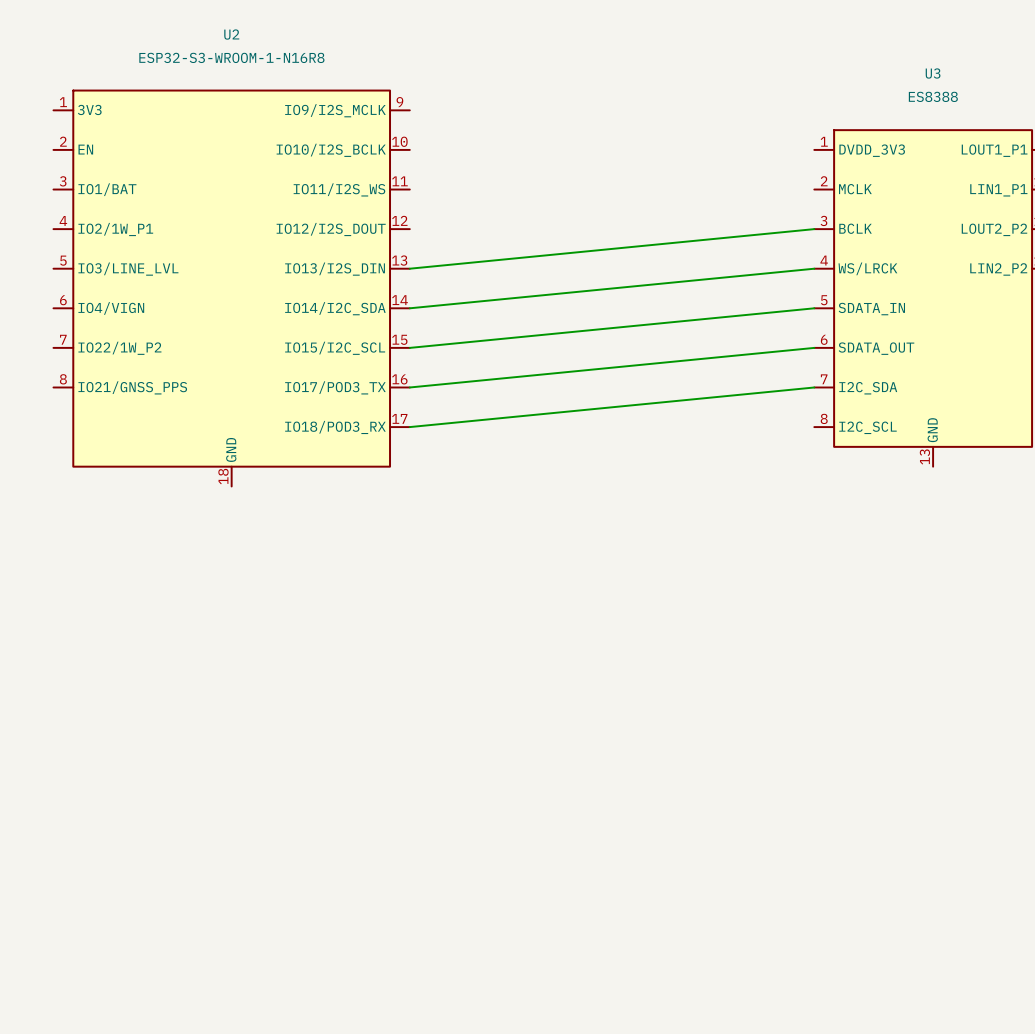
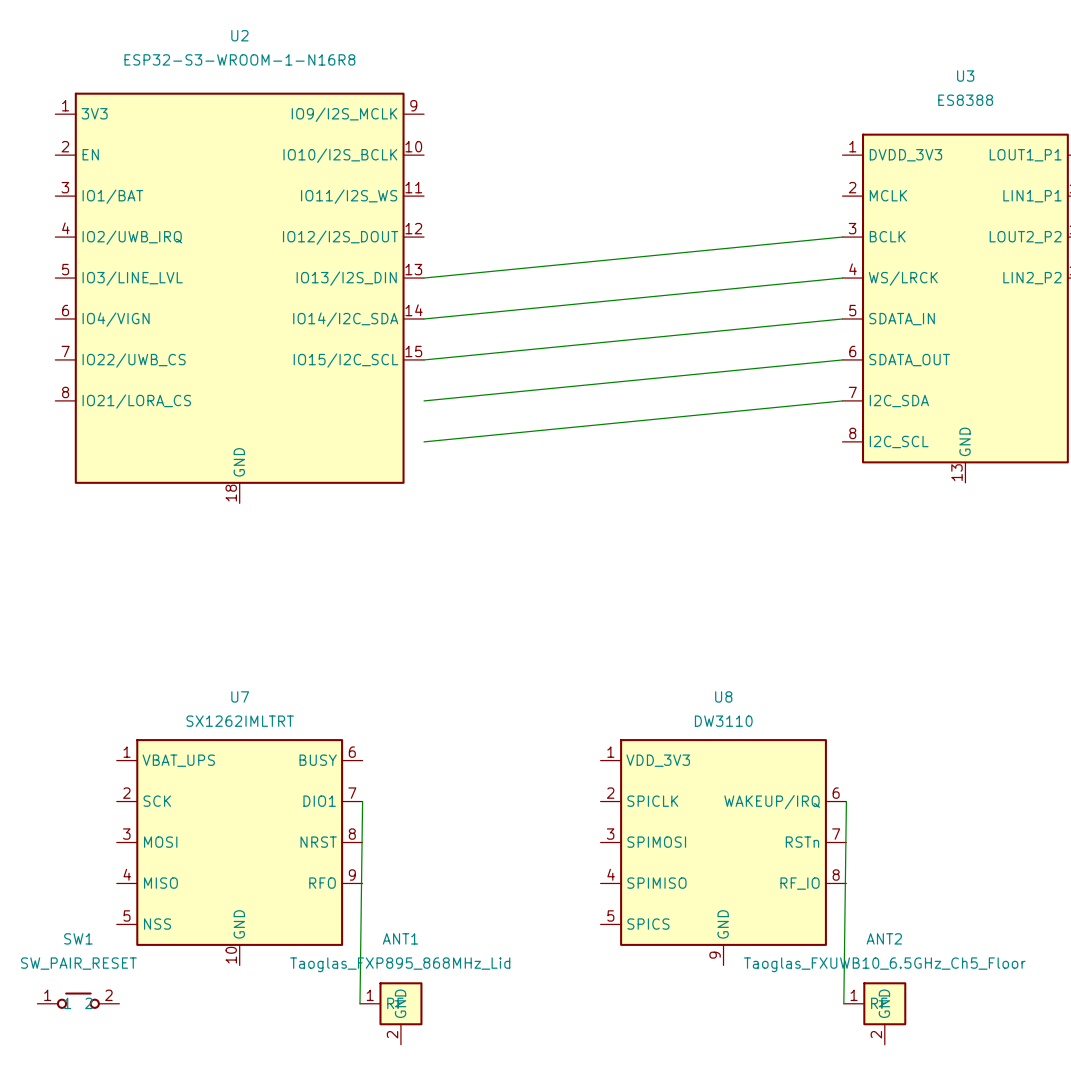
U2 symbol: [53, 89, 410, 487] -> [55, 92, 425, 504]
wire: none -> (362, 801) (359, 1003)
wire: none -> (846, 801) (843, 1003)
U7: none -> SX1262IMLTRT (239, 852)
U8: none -> DW3110 (723, 852)
SW1: none -> SW_PAIR_RESET (78, 1000)
ANT1: none -> Taoglas_FXP895_868MHz_Lid (391, 1013)
ANT2: none -> Taoglas_FXUWB10_6.5GHz_Ch5_Floor (875, 1013)

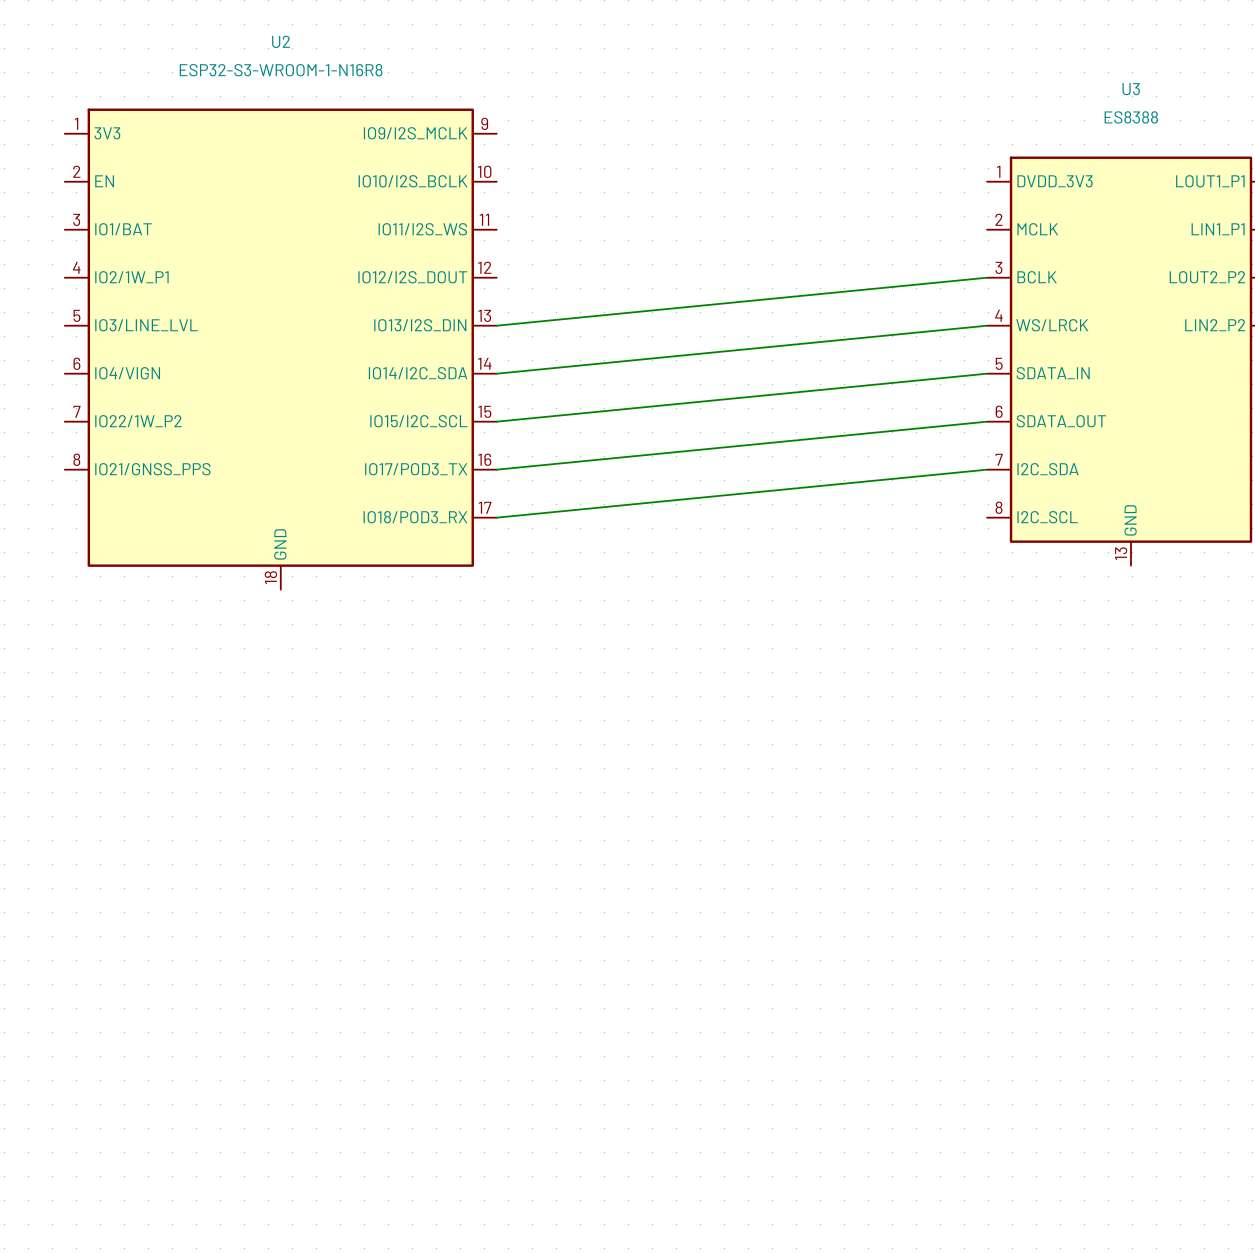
U2 symbol: [55, 92, 425, 504] -> [64, 108, 497, 590]
wire: (362, 801) (359, 1003) -> none
wire: (846, 801) (843, 1003) -> none
U7: SX1262IMLTRT (239, 852) -> none
U8: DW3110 (723, 852) -> none
SW1: SW_PAIR_RESET (78, 1000) -> none
ANT1: Taoglas_FXP895_868MHz_Lid (391, 1013) -> none
ANT2: Taoglas_FXUWB10_6.5GHz_Ch5_Floor (875, 1013) -> none

